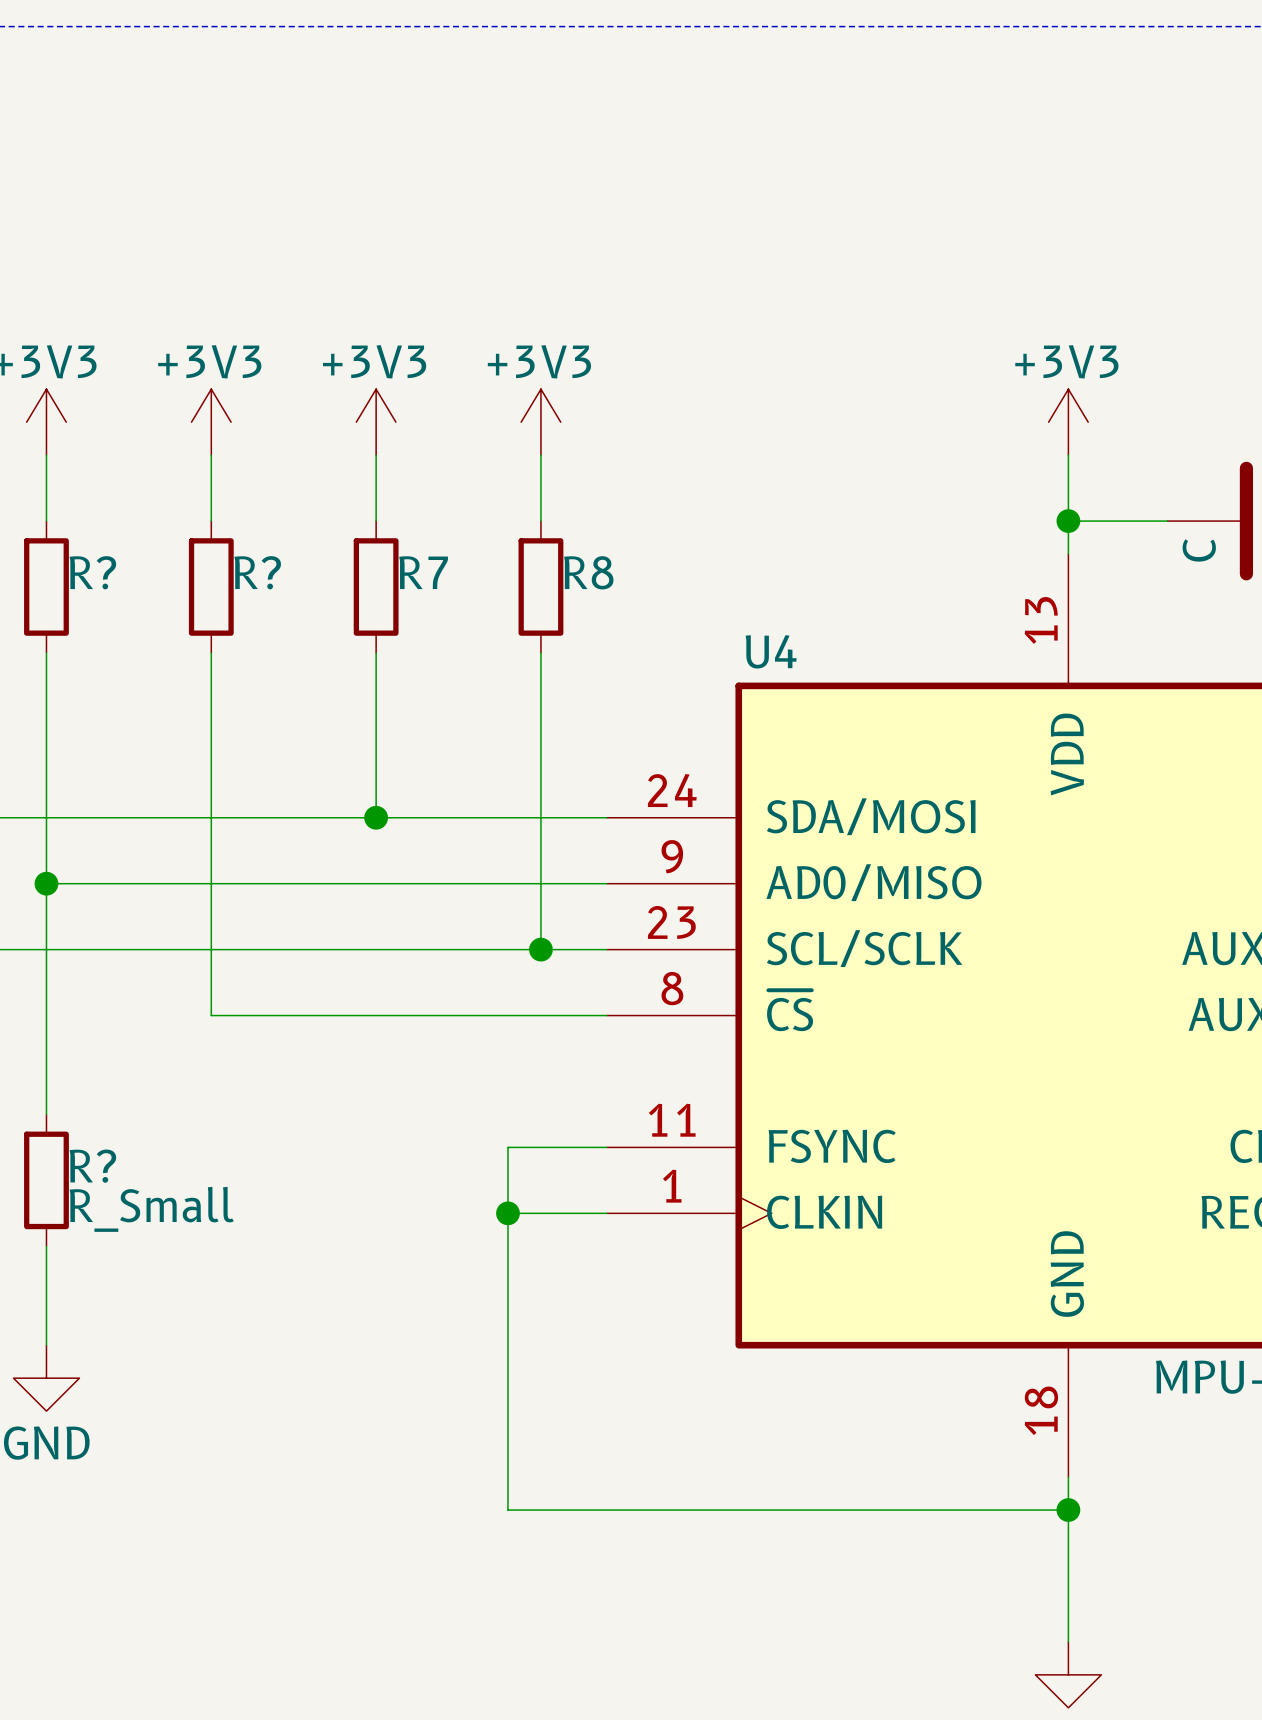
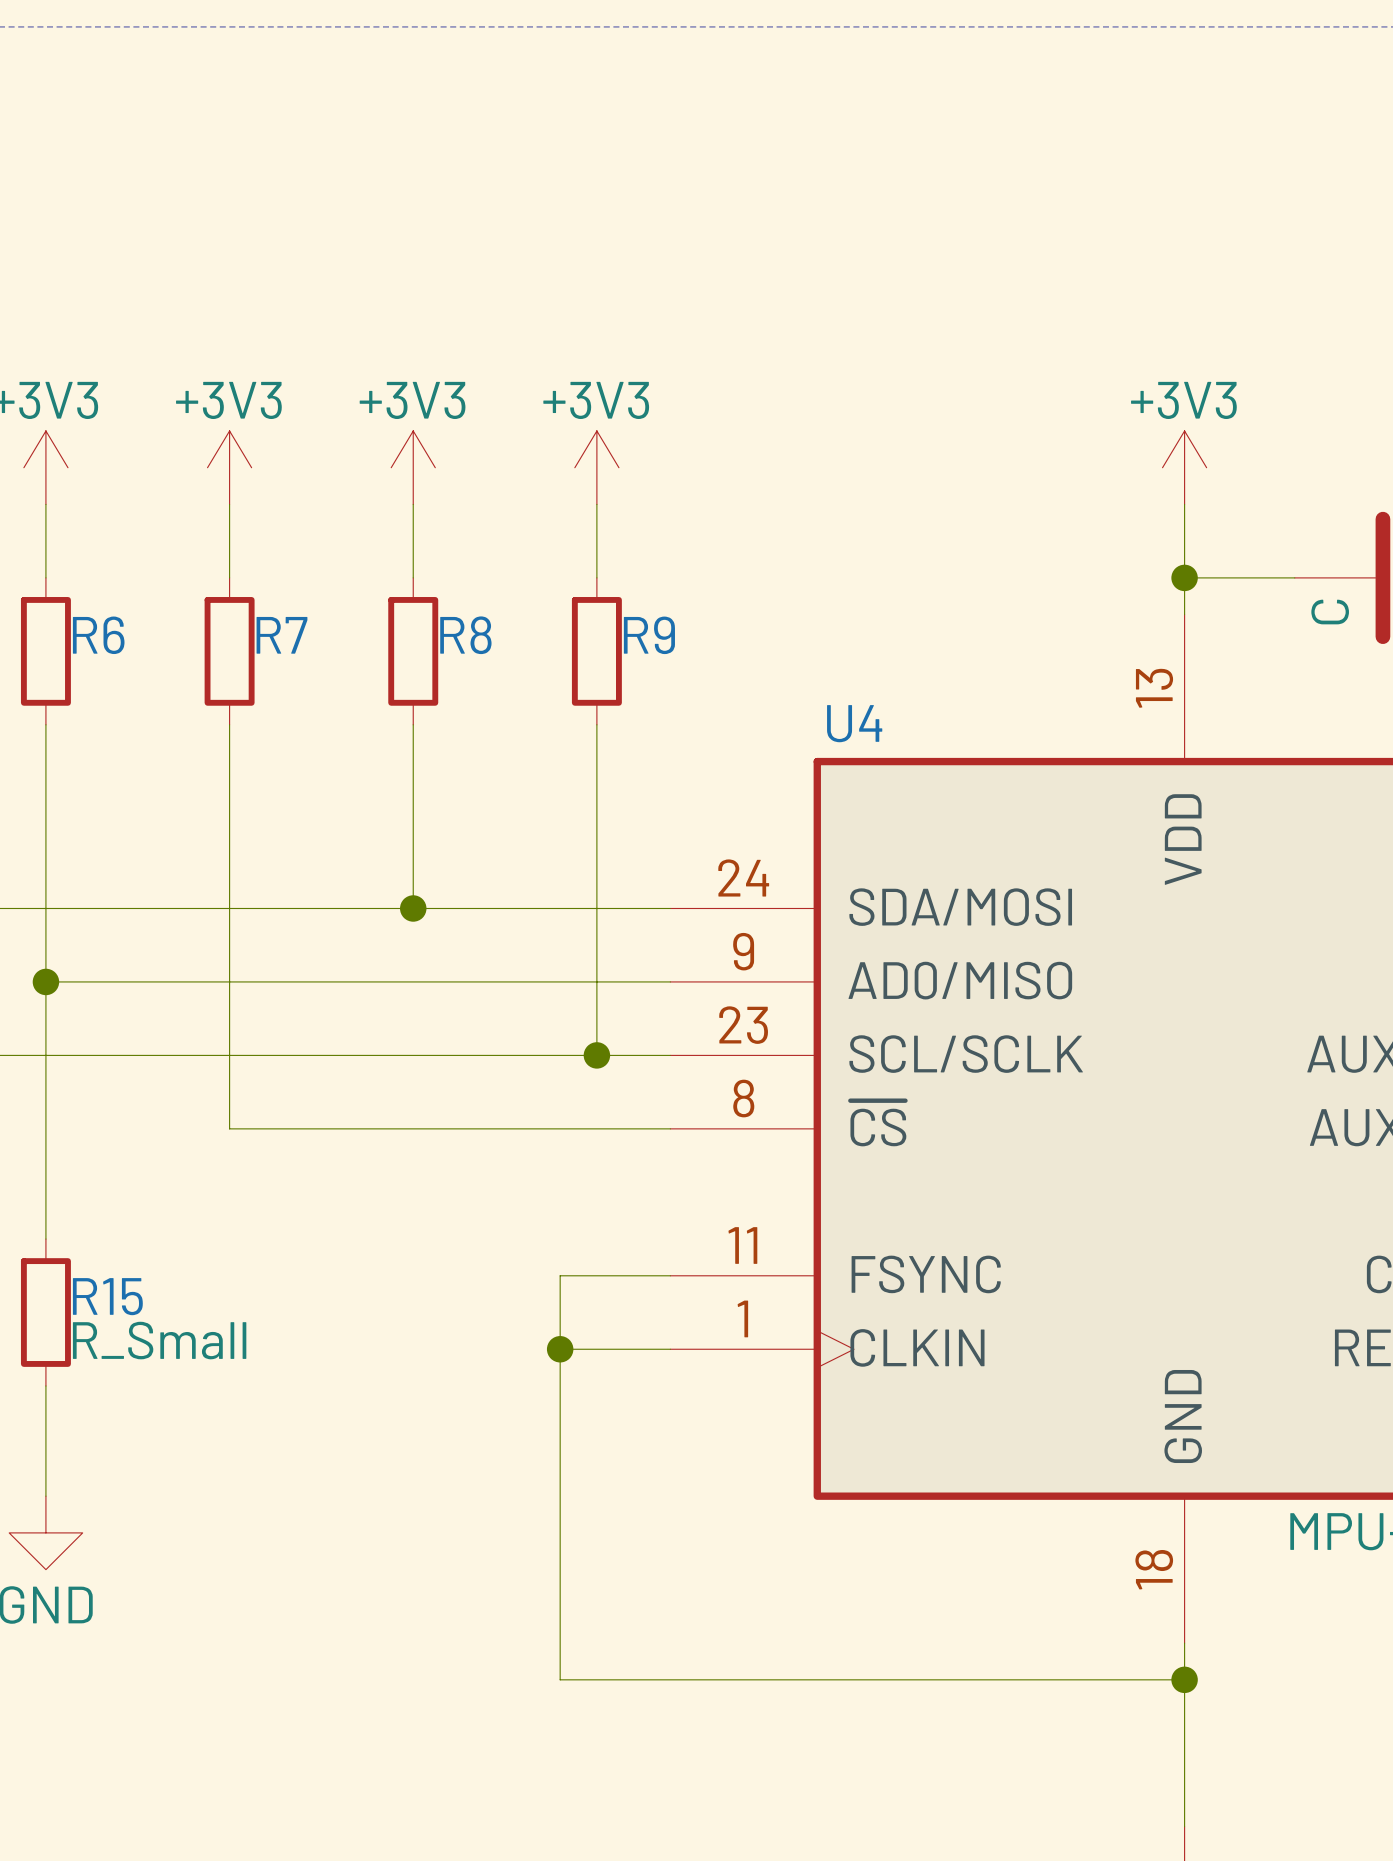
R? name: R? (92, 572) -> R6 (98, 635)
R? name: R? (257, 572) -> R7 (281, 635)
R7 name: R7 (423, 572) -> R8 (465, 635)
R8 name: R8 (588, 572) -> R9 (649, 635)
R? name: R? (92, 1166) -> R15 (107, 1296)

